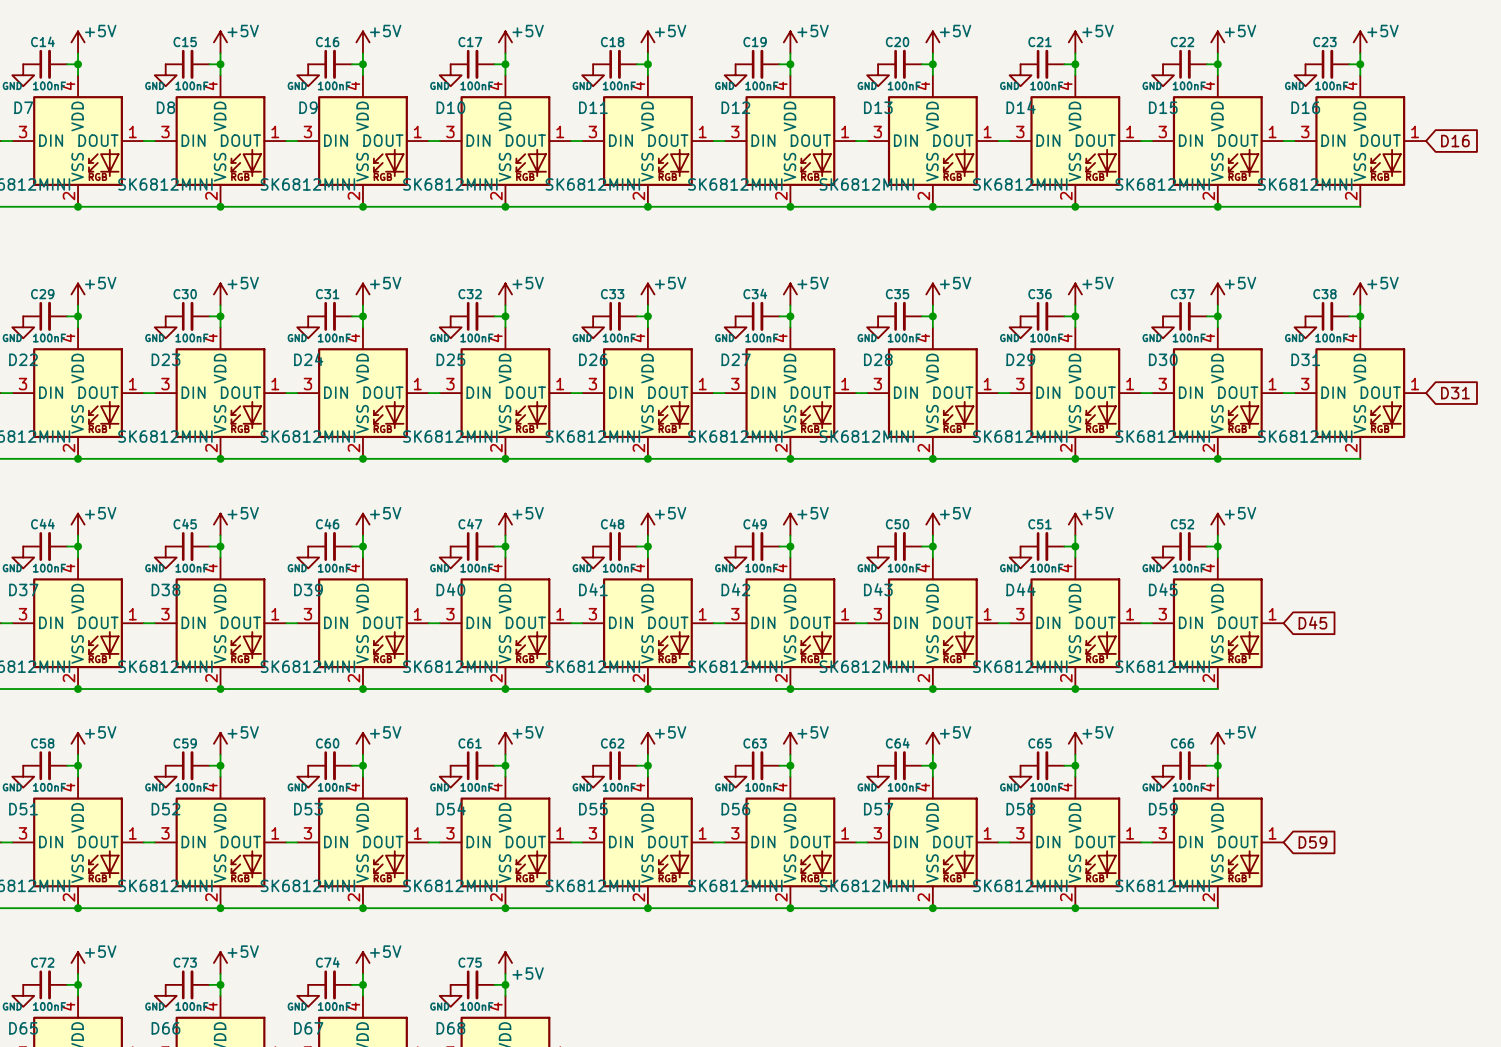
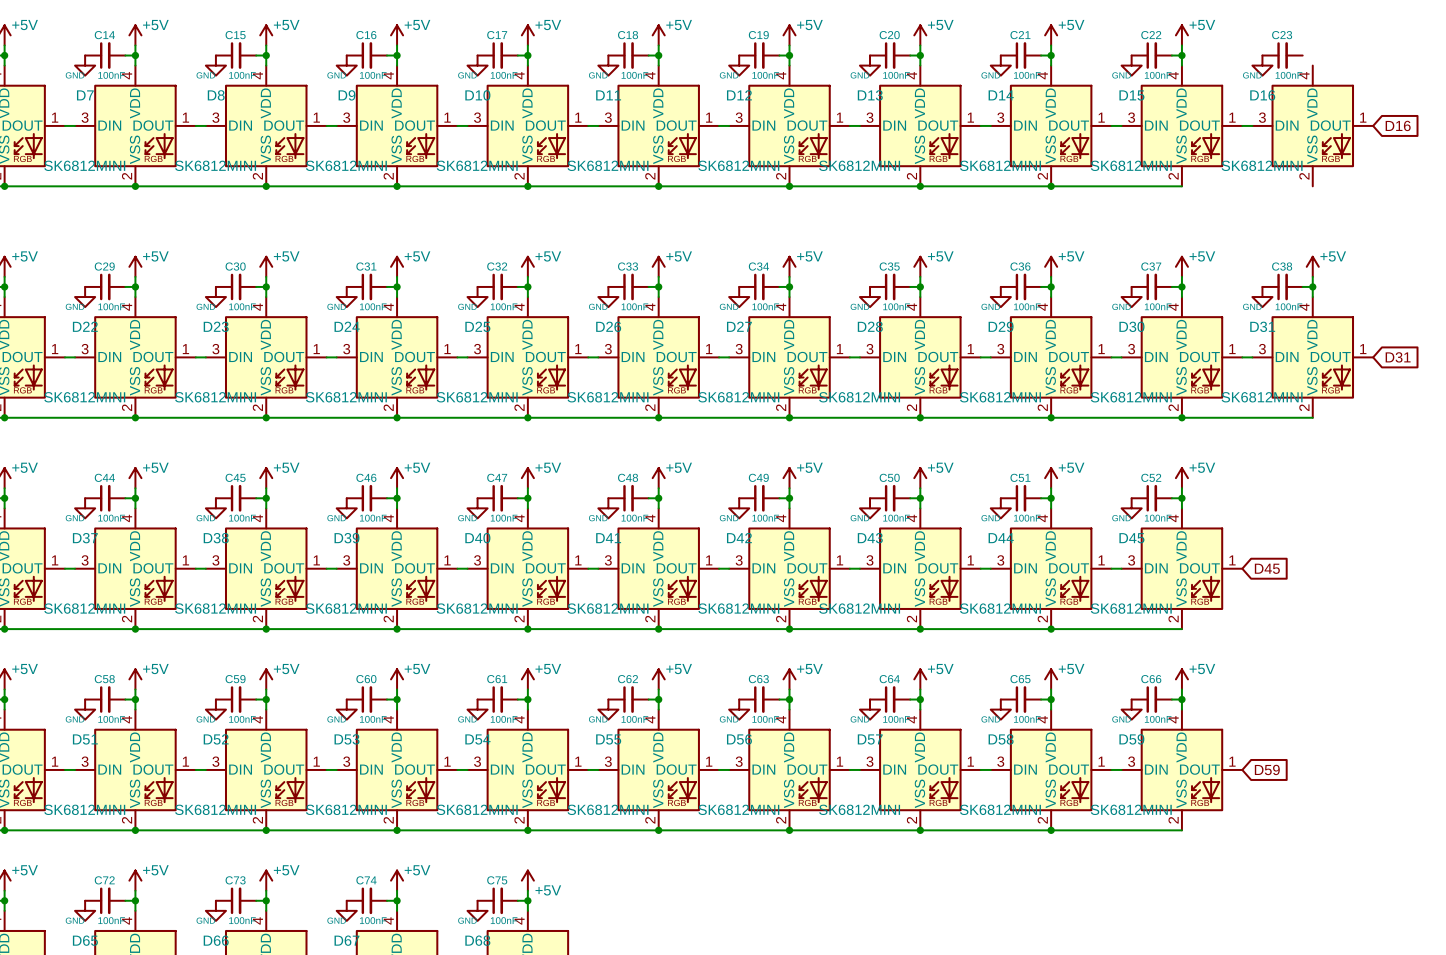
power symbol: +5V (1360, 42) -> none
wire: (1360, 53) (1360, 75) -> none
wire: (1349, 64) (1360, 64) -> none
junction: (1360, 64) -> none
wire: (1217, 206) (1360, 206) -> none
junction: (1217, 206) -> none

